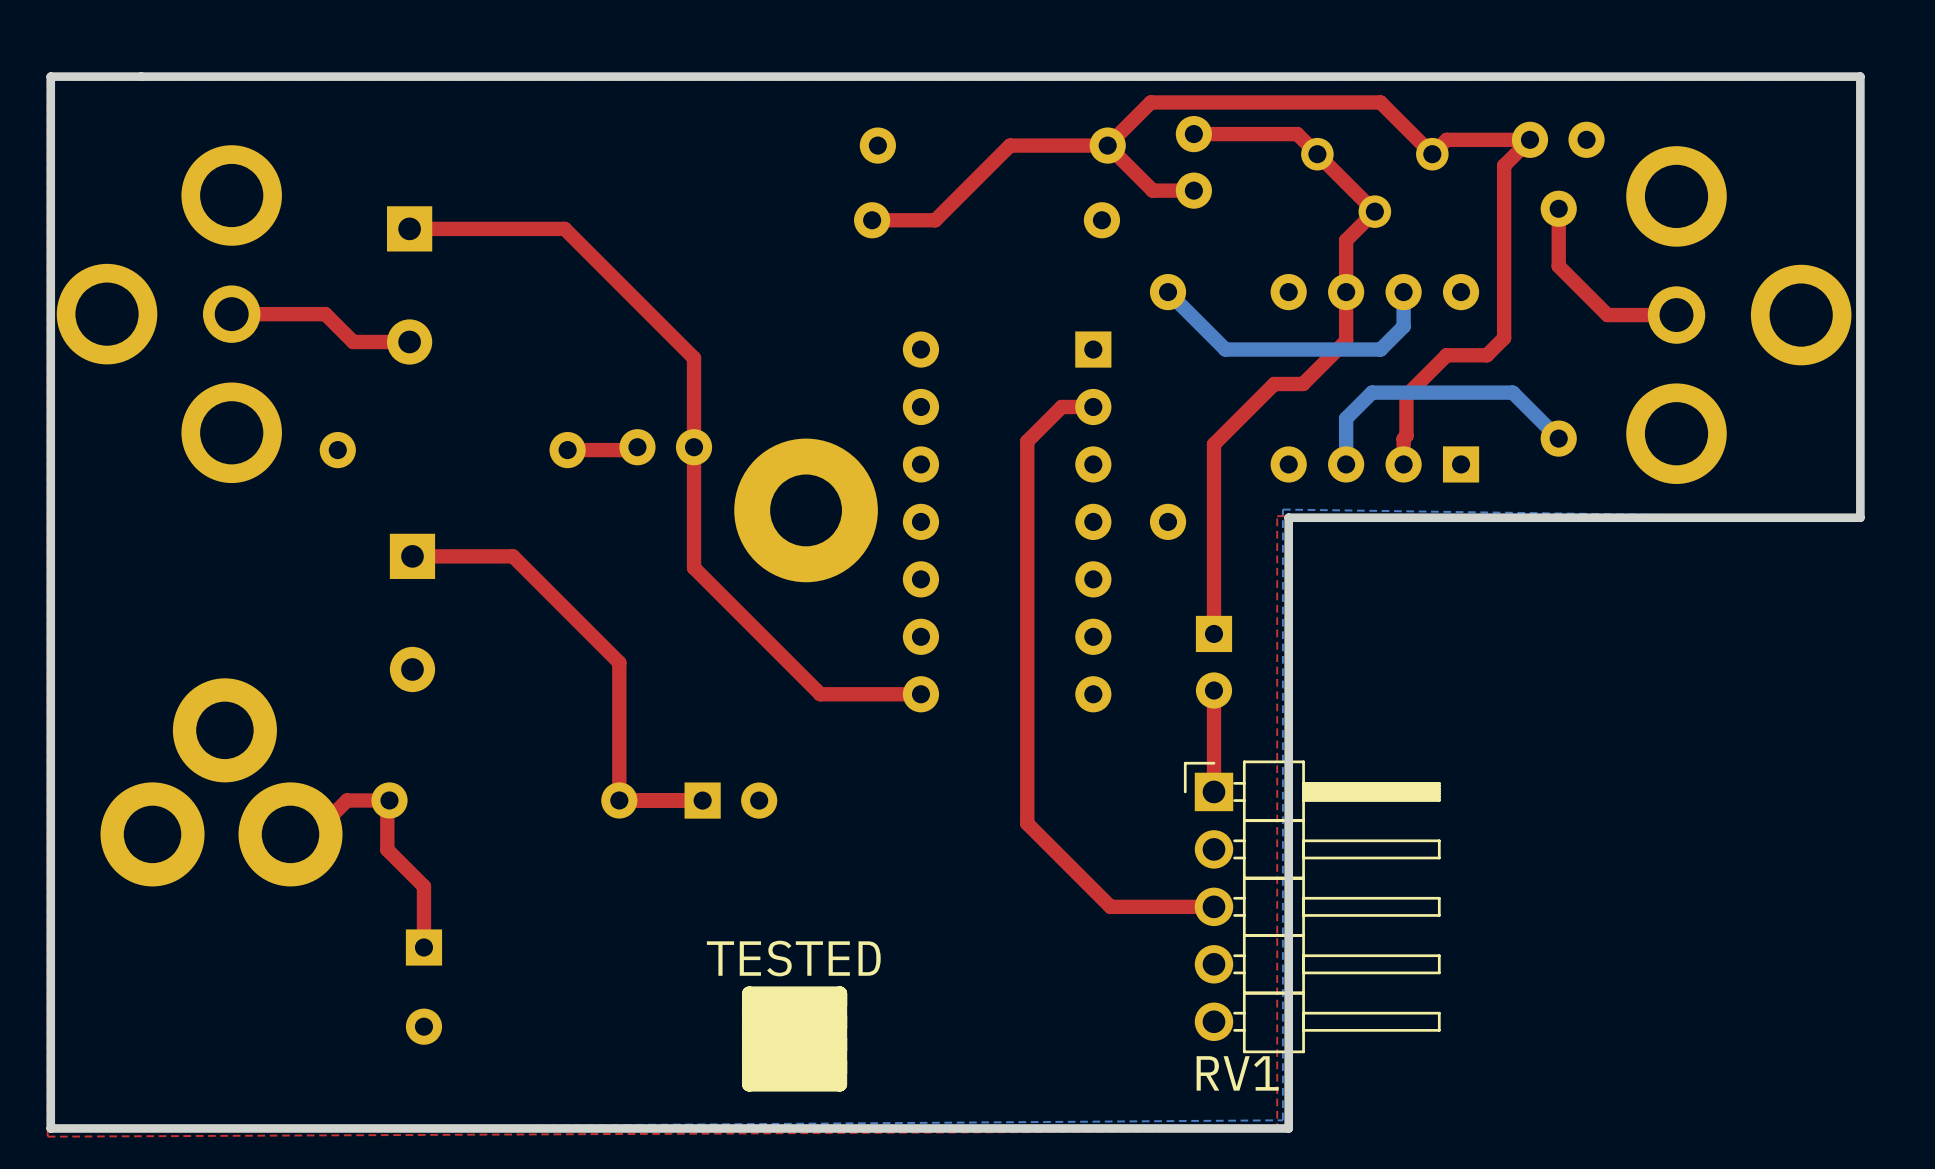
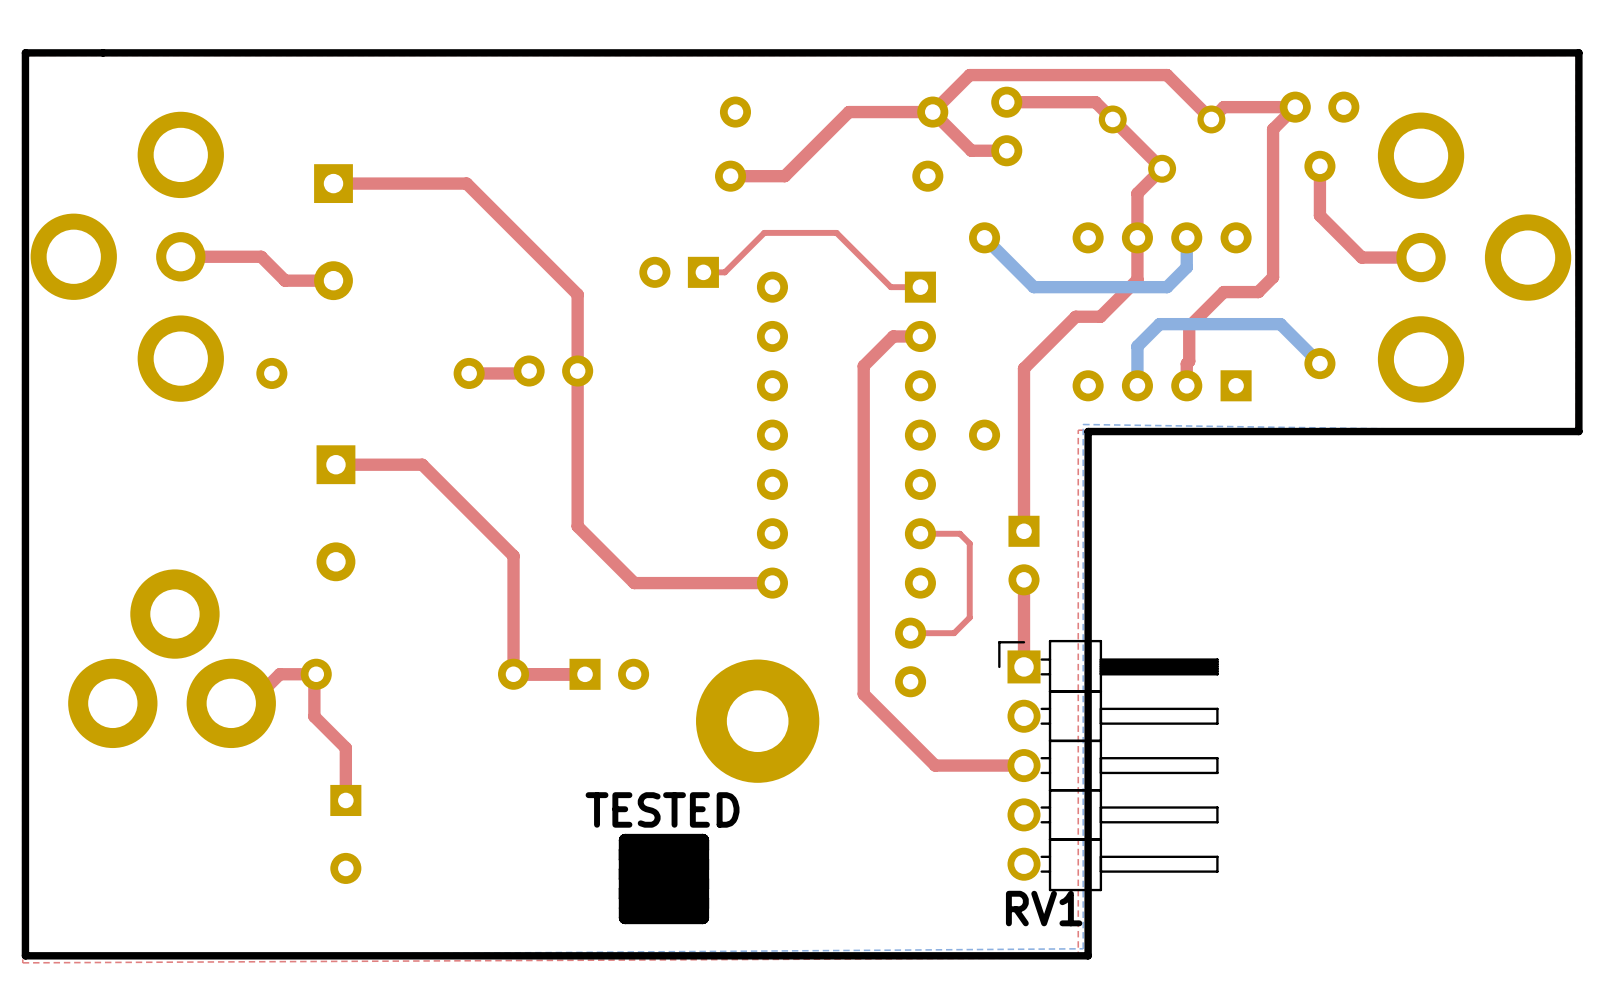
part: none -> (679, 272)
top track: none -> (703, 272) (724, 272) (764, 232) (836, 232) (890, 287) (920, 287)
part position: (806, 510) -> (757, 721)
top track: (694, 567) (820, 694) -> (577, 474) (577, 526) (634, 583) (686, 583)
top track: none -> (920, 533) (959, 533) (969, 543) (969, 617) (954, 633) (910, 633)
part: none -> (910, 657)

